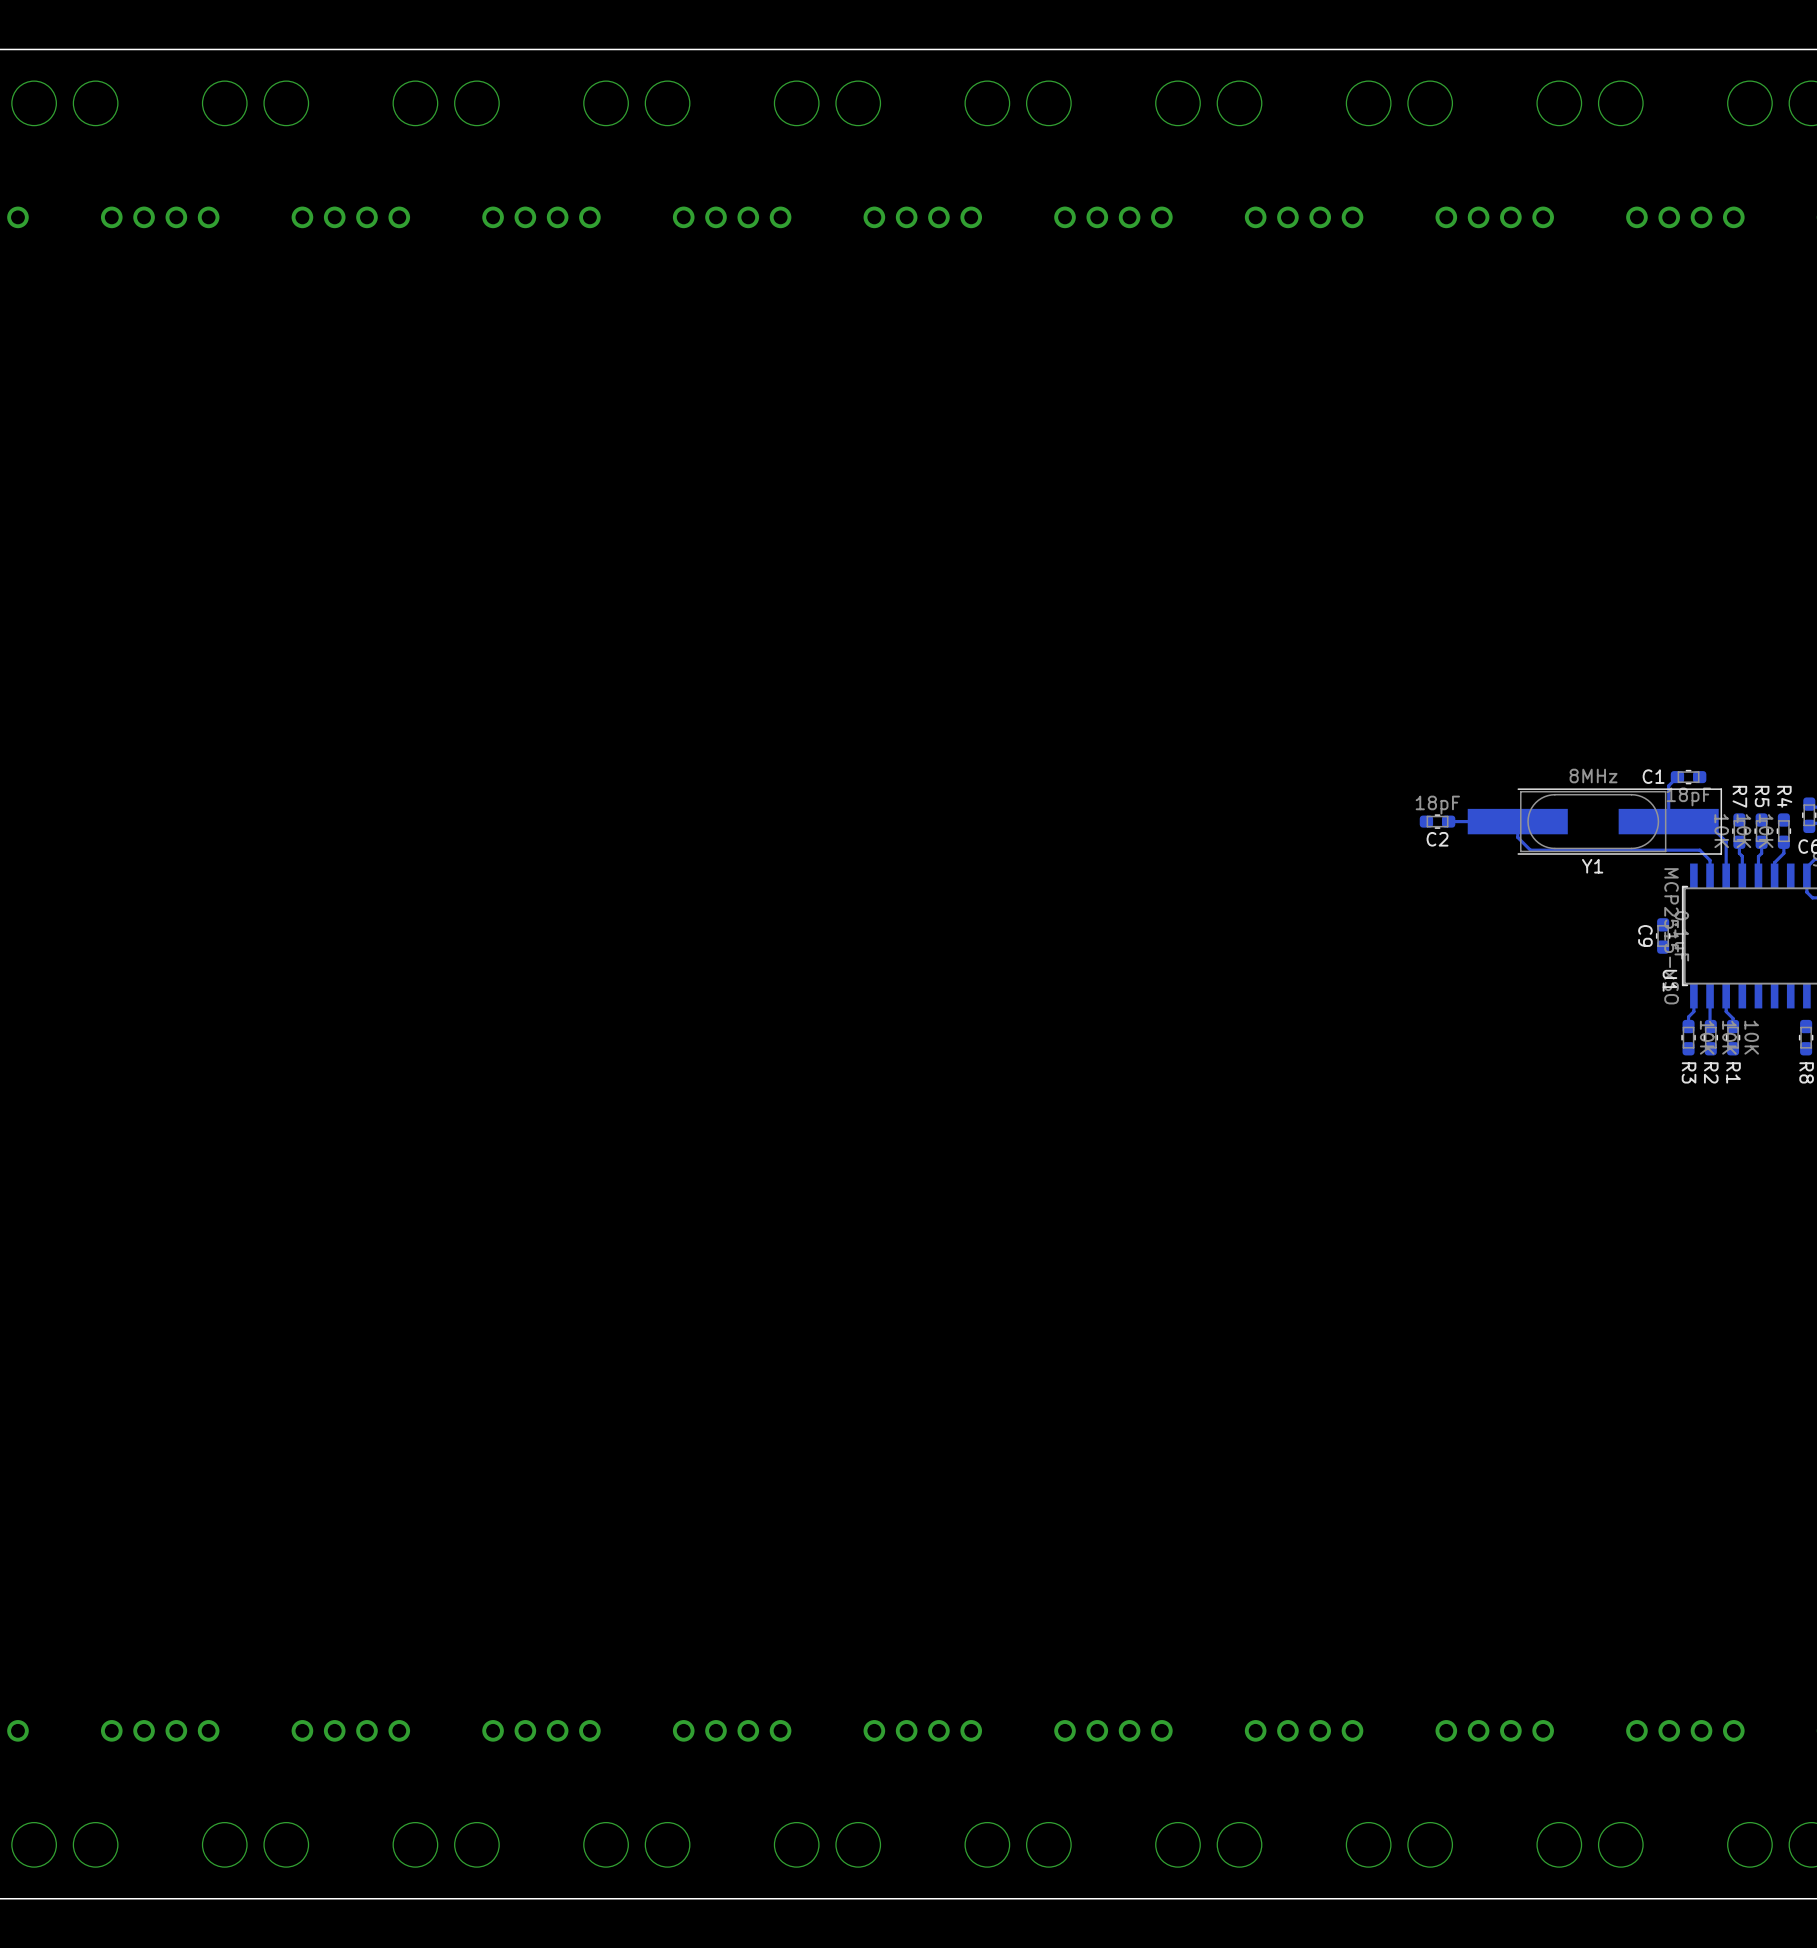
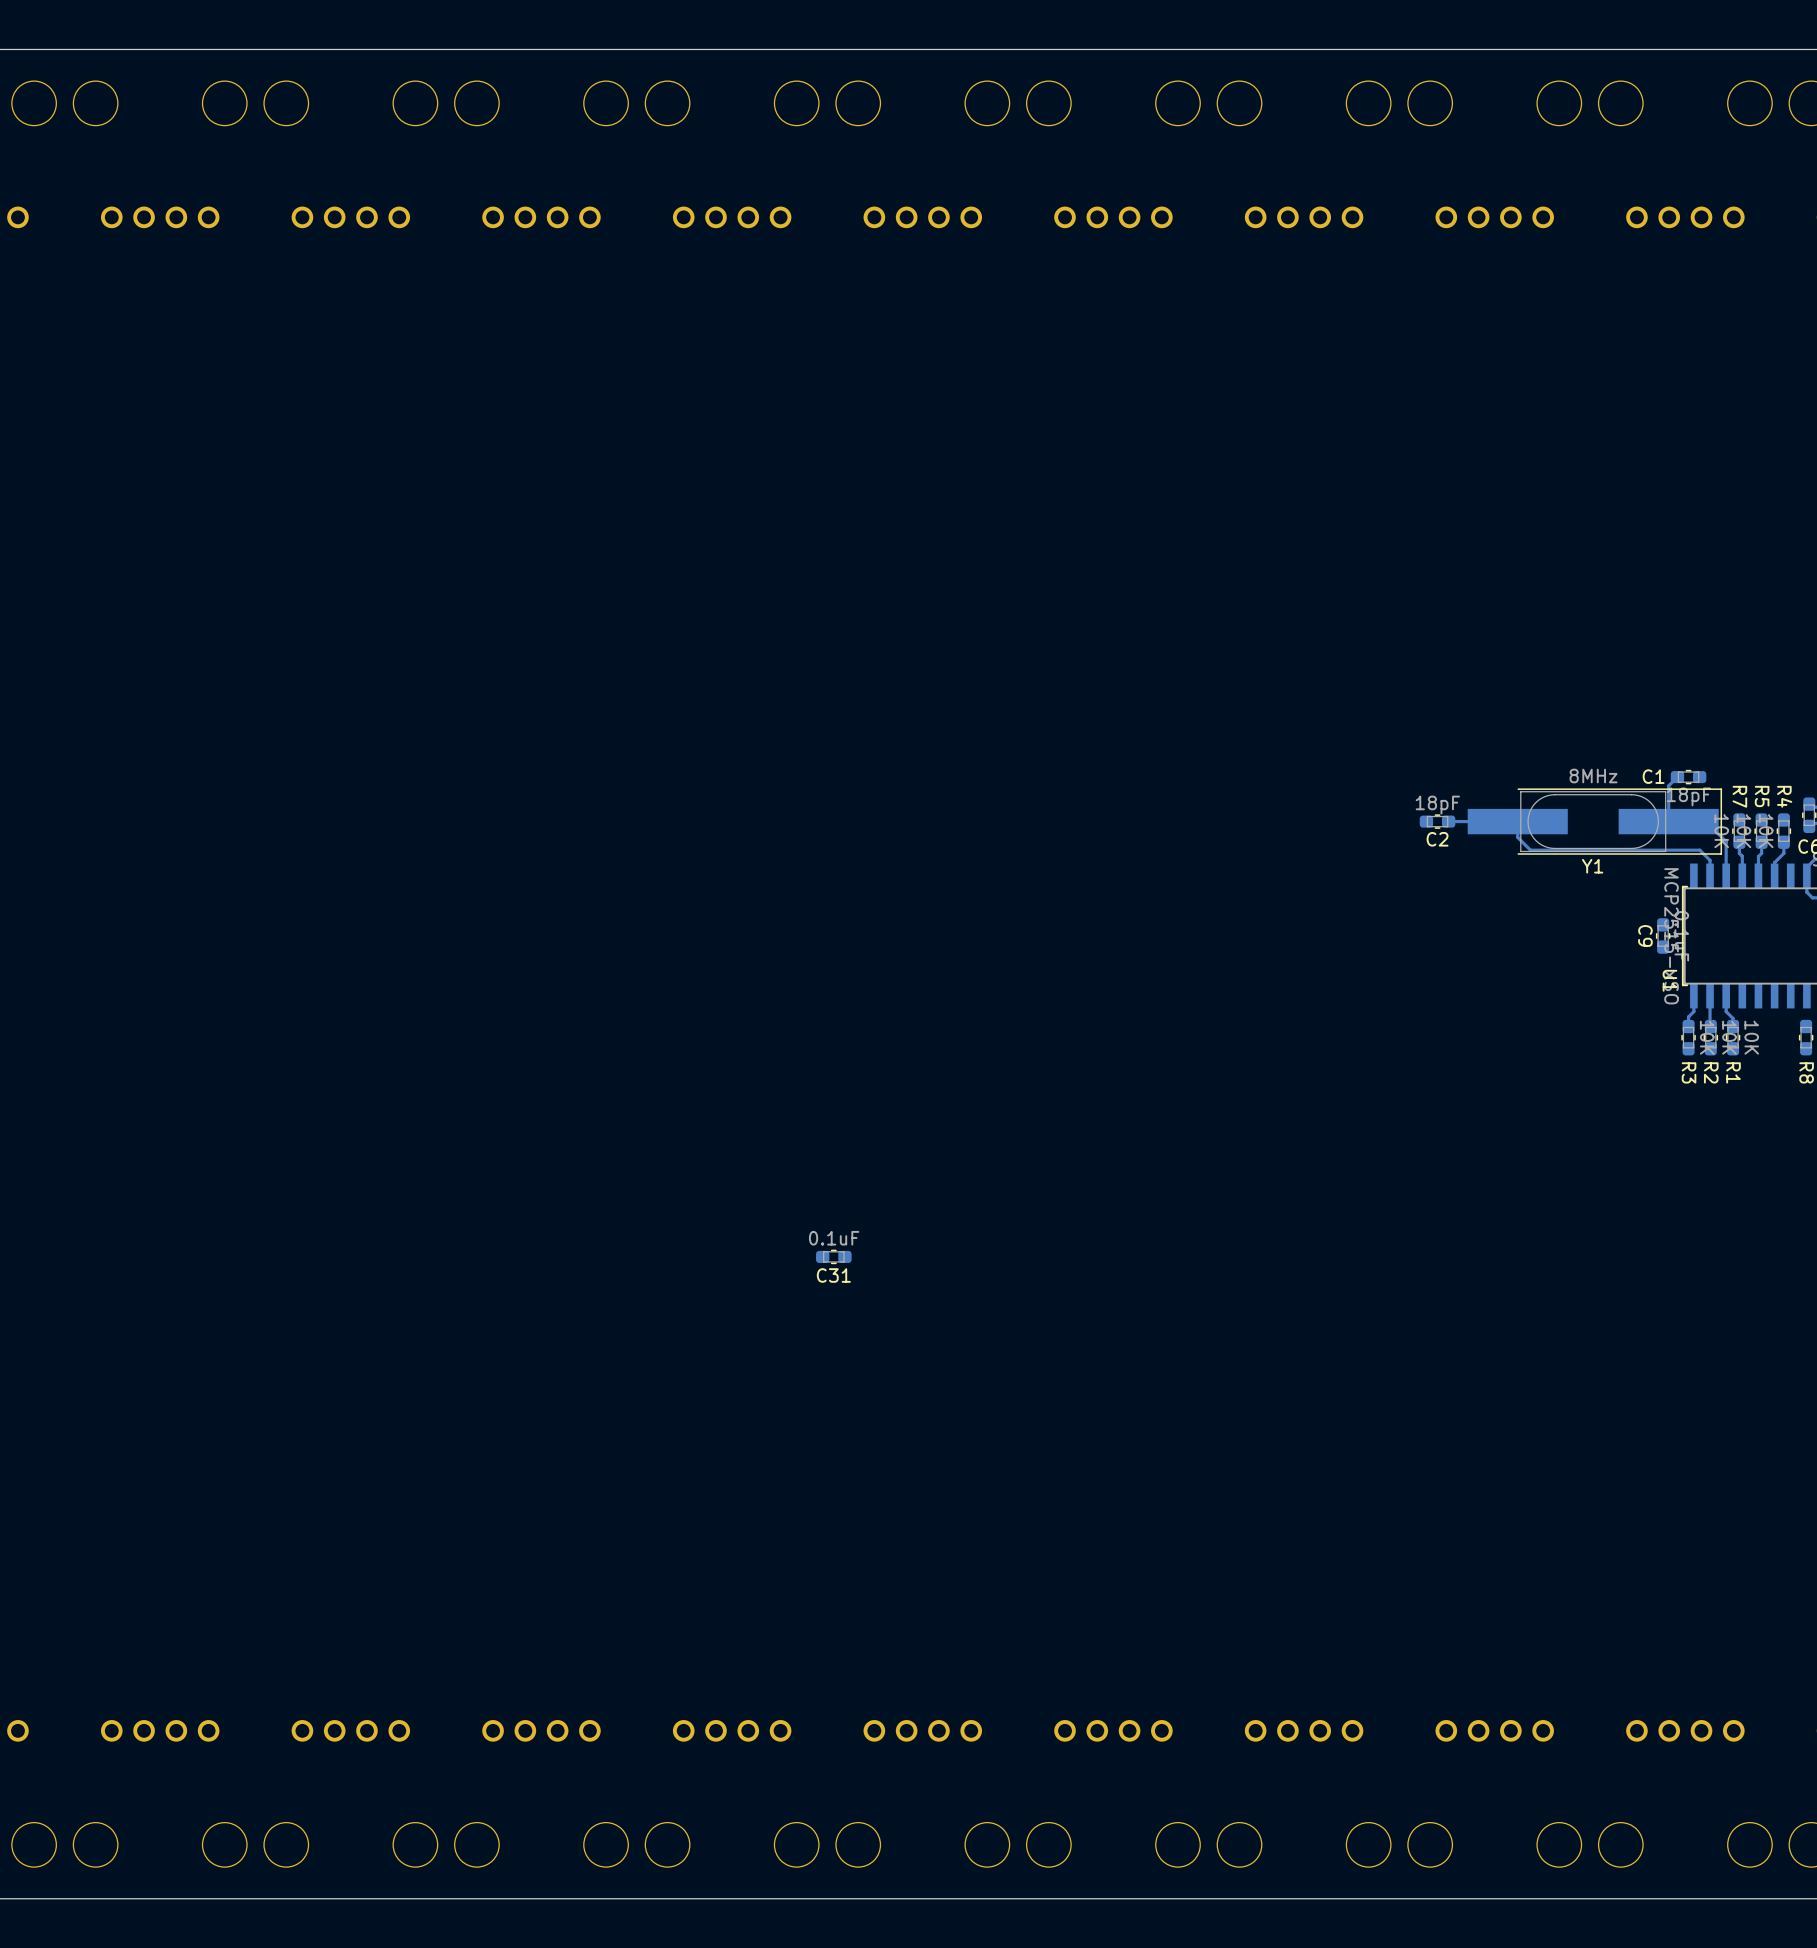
C31: none -> 0.1uF (833, 1256)

